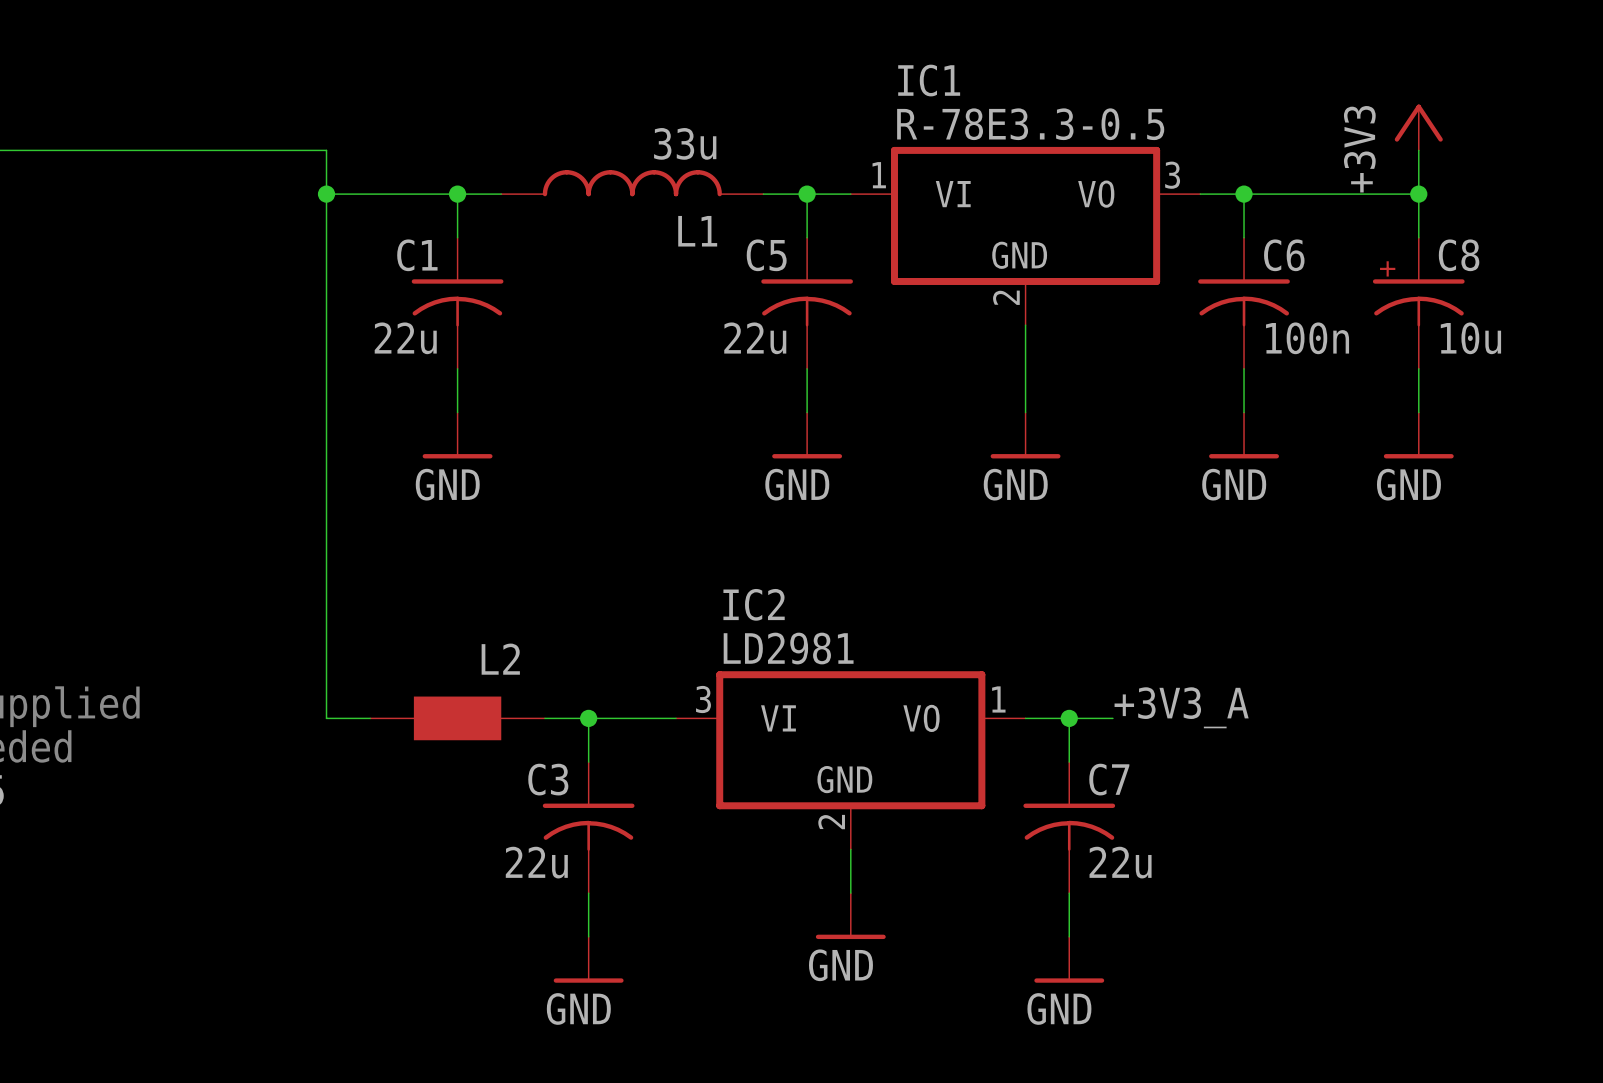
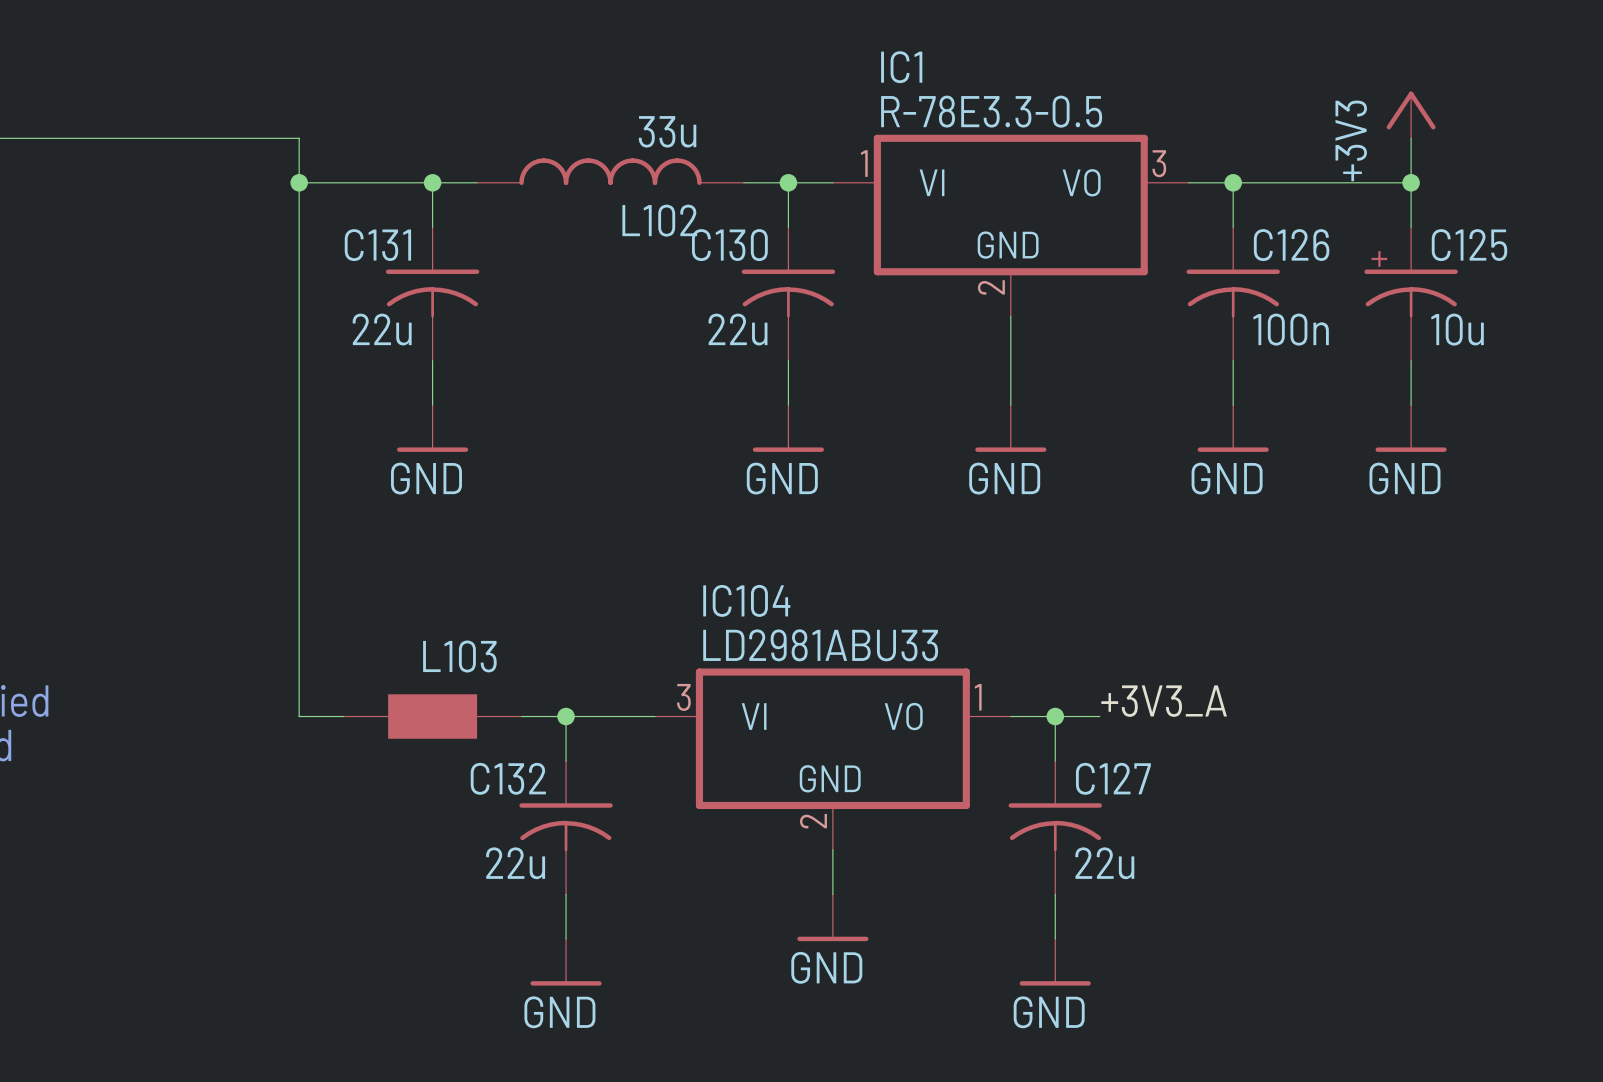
L1 name: L1 (697, 231) -> L102 (659, 220)
C1 name: C1 (417, 255) -> C131 (377, 245)
C5 name: C5 (766, 255) -> C130 (729, 245)
C6 name: C6 (1284, 255) -> C126 (1291, 245)
C8 name: C8 (1459, 255) -> C125 (1469, 245)
IC2 name: IC2 (754, 604) -> IC104 (746, 600)
IC2 value: LD2981 (788, 648) -> LD2981ABU33 (820, 645)
L2 name: L2 (500, 659) -> L103 (459, 656)
C3 name: C3 (548, 779) -> C132 (508, 778)
C7 name: C7 (1109, 779) -> C127 (1113, 778)

